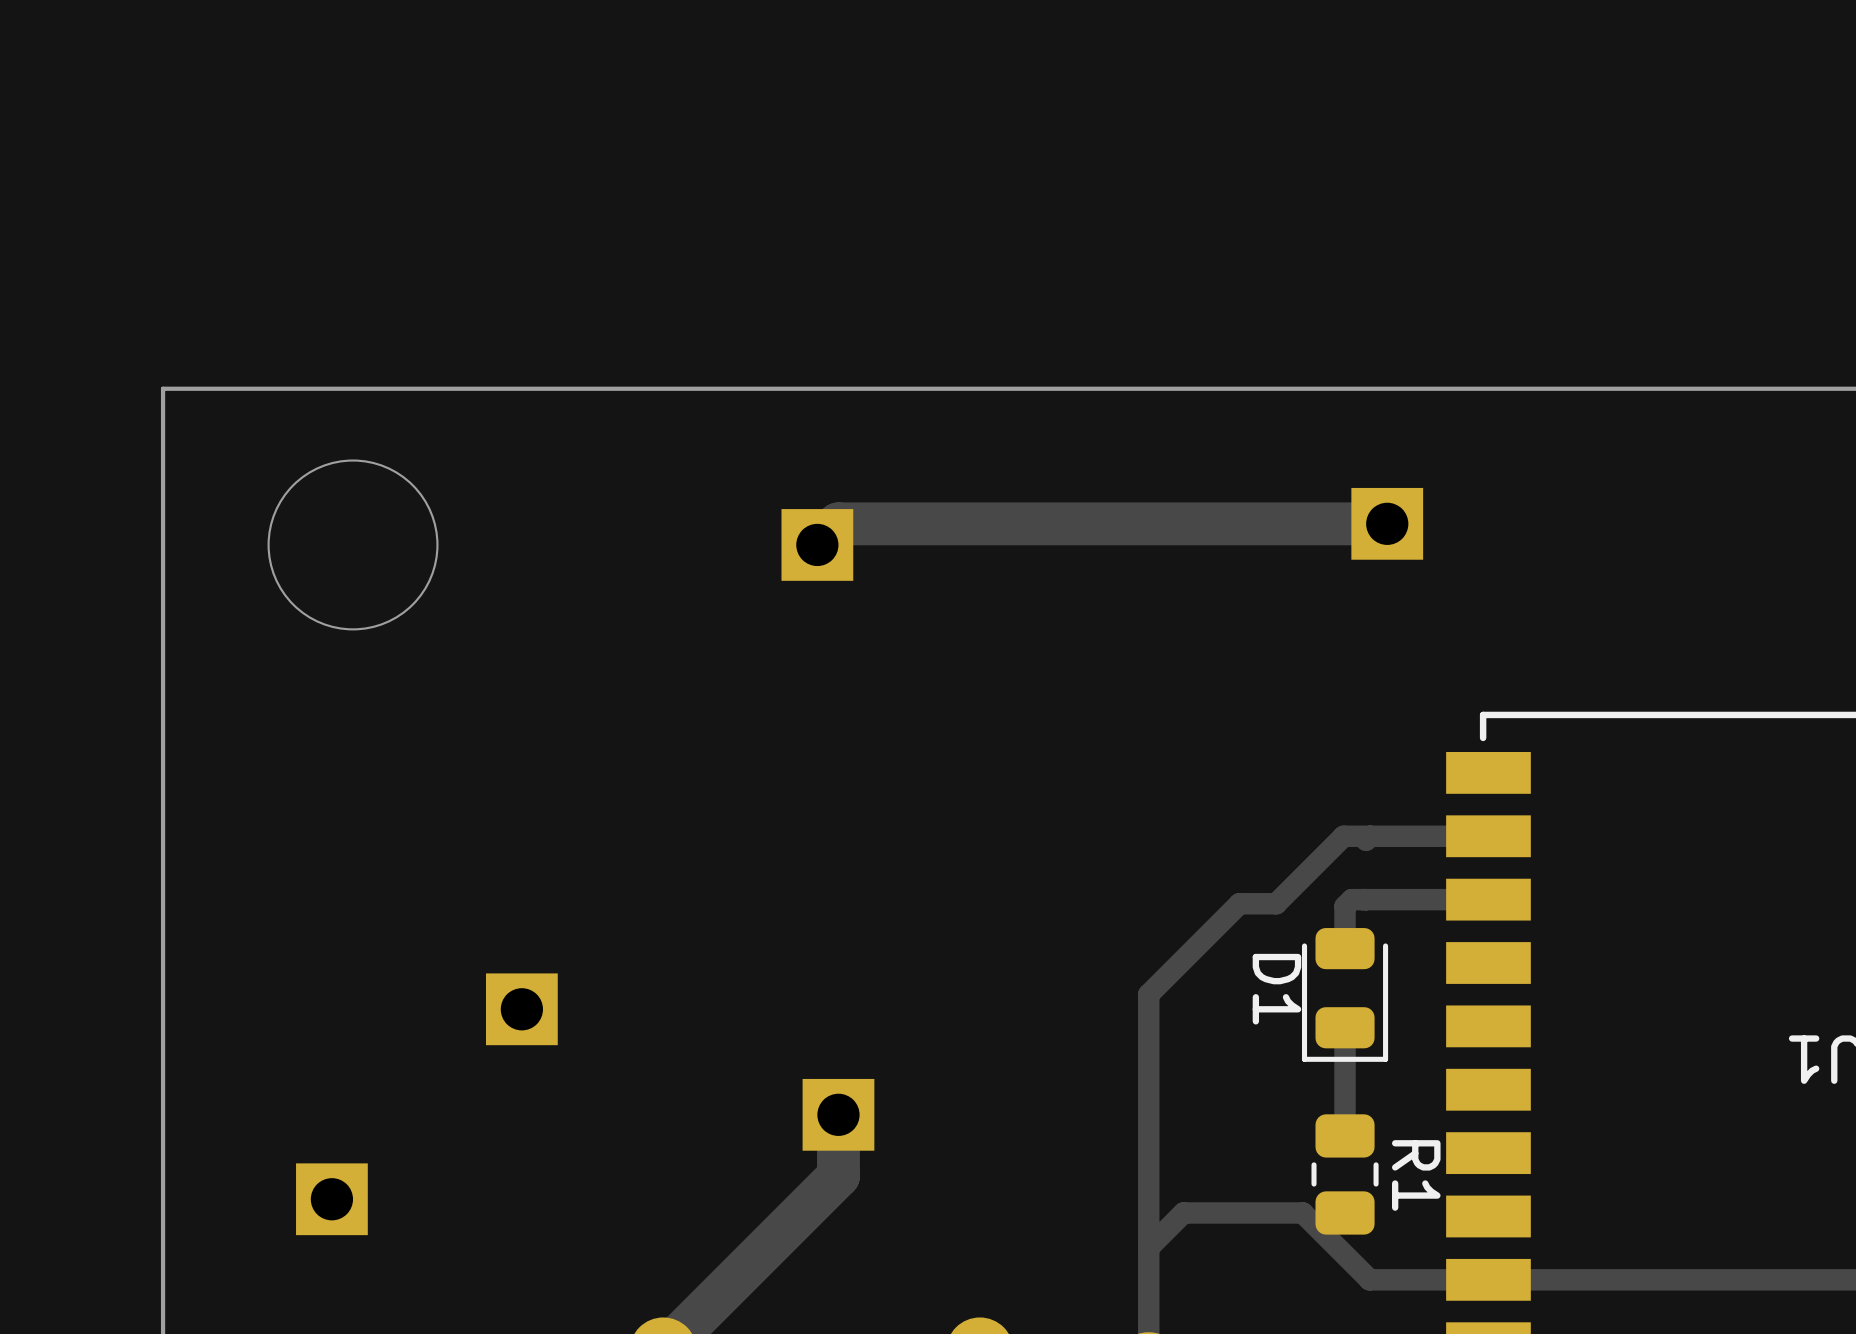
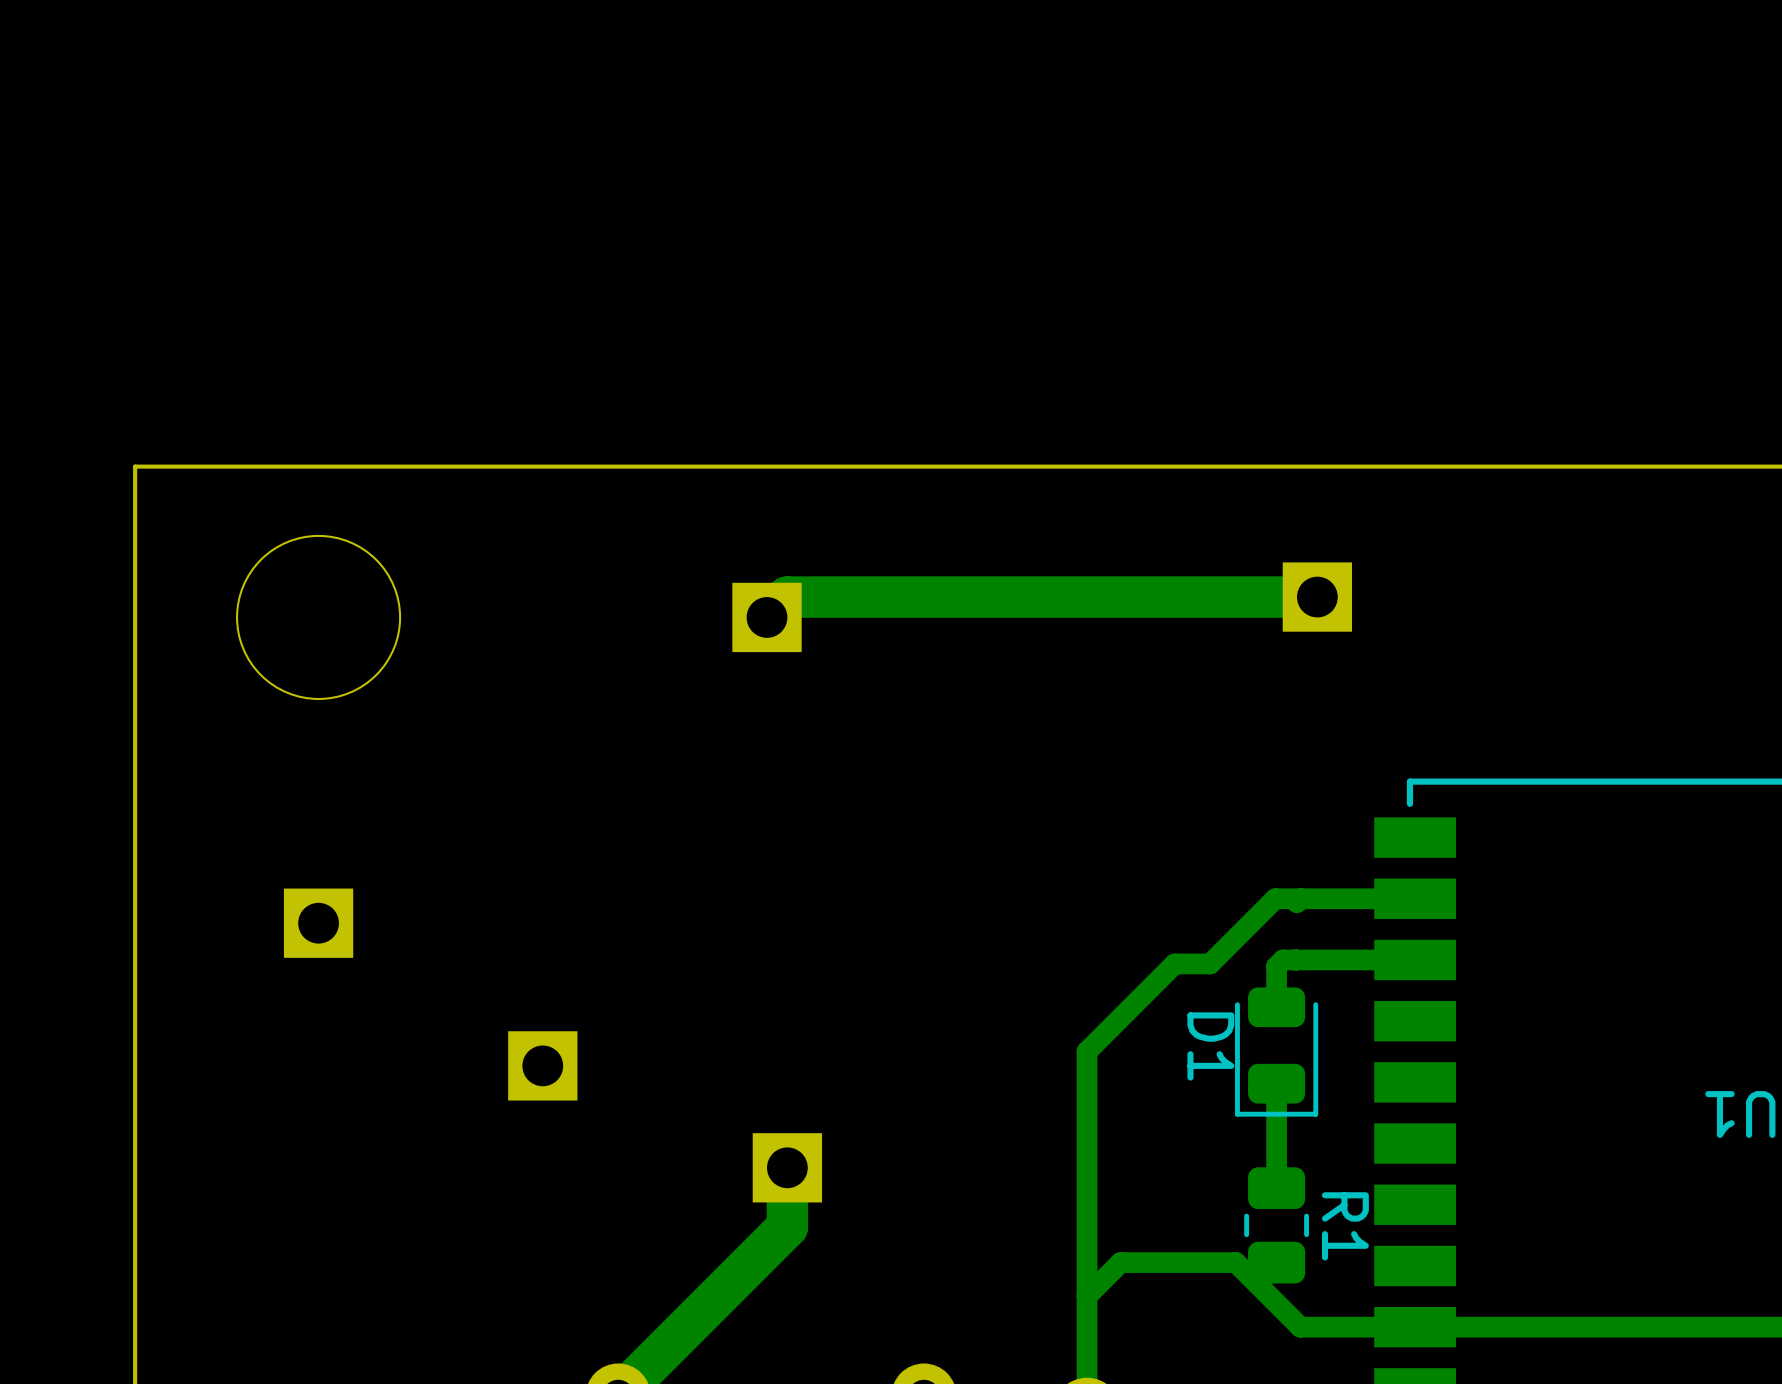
part: none -> (318, 923)
part position: (521, 1009) -> (542, 1065)
part: (331, 1199) -> none

